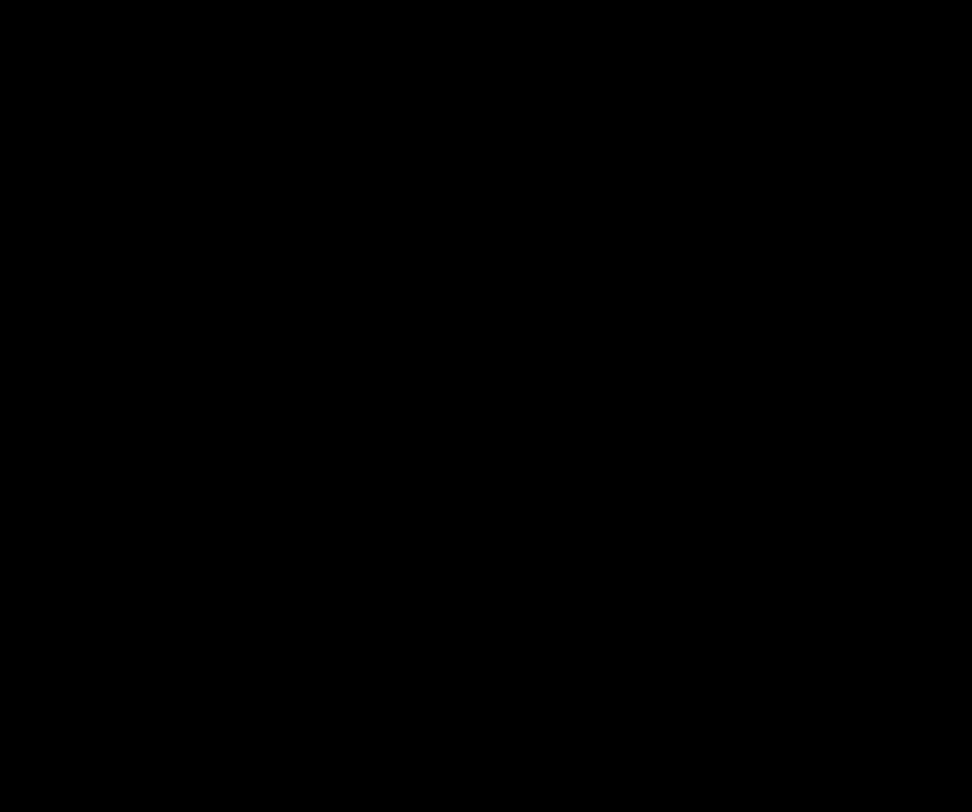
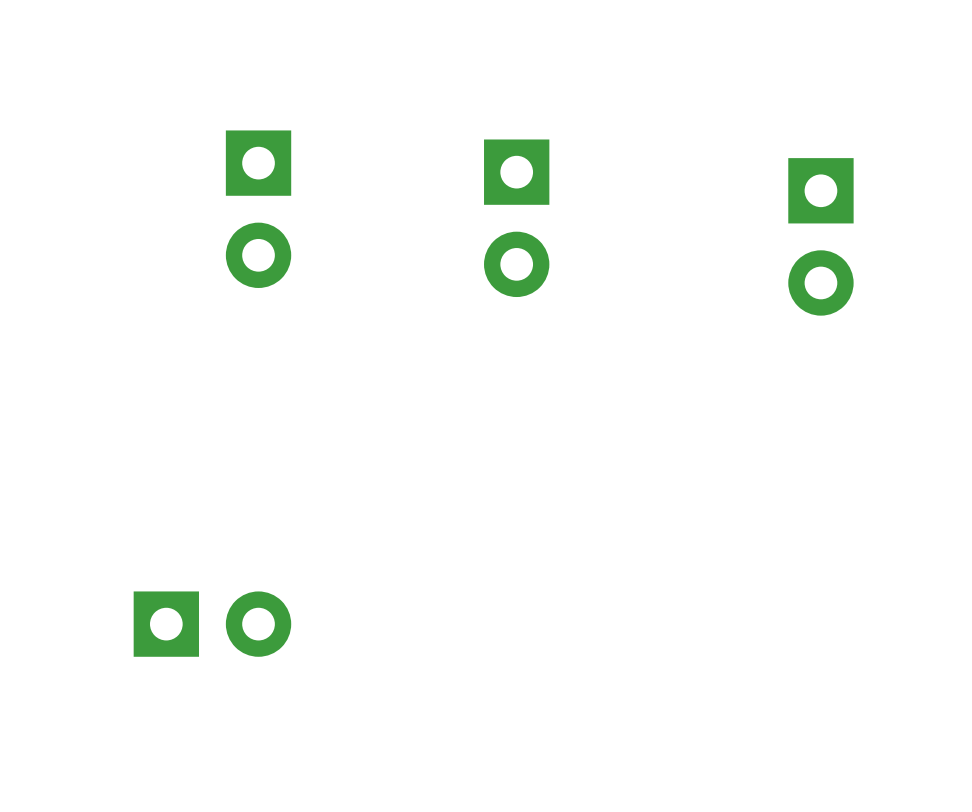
part: none -> (258, 209)
part: none -> (516, 218)
part: none -> (820, 236)
part: none -> (212, 624)

